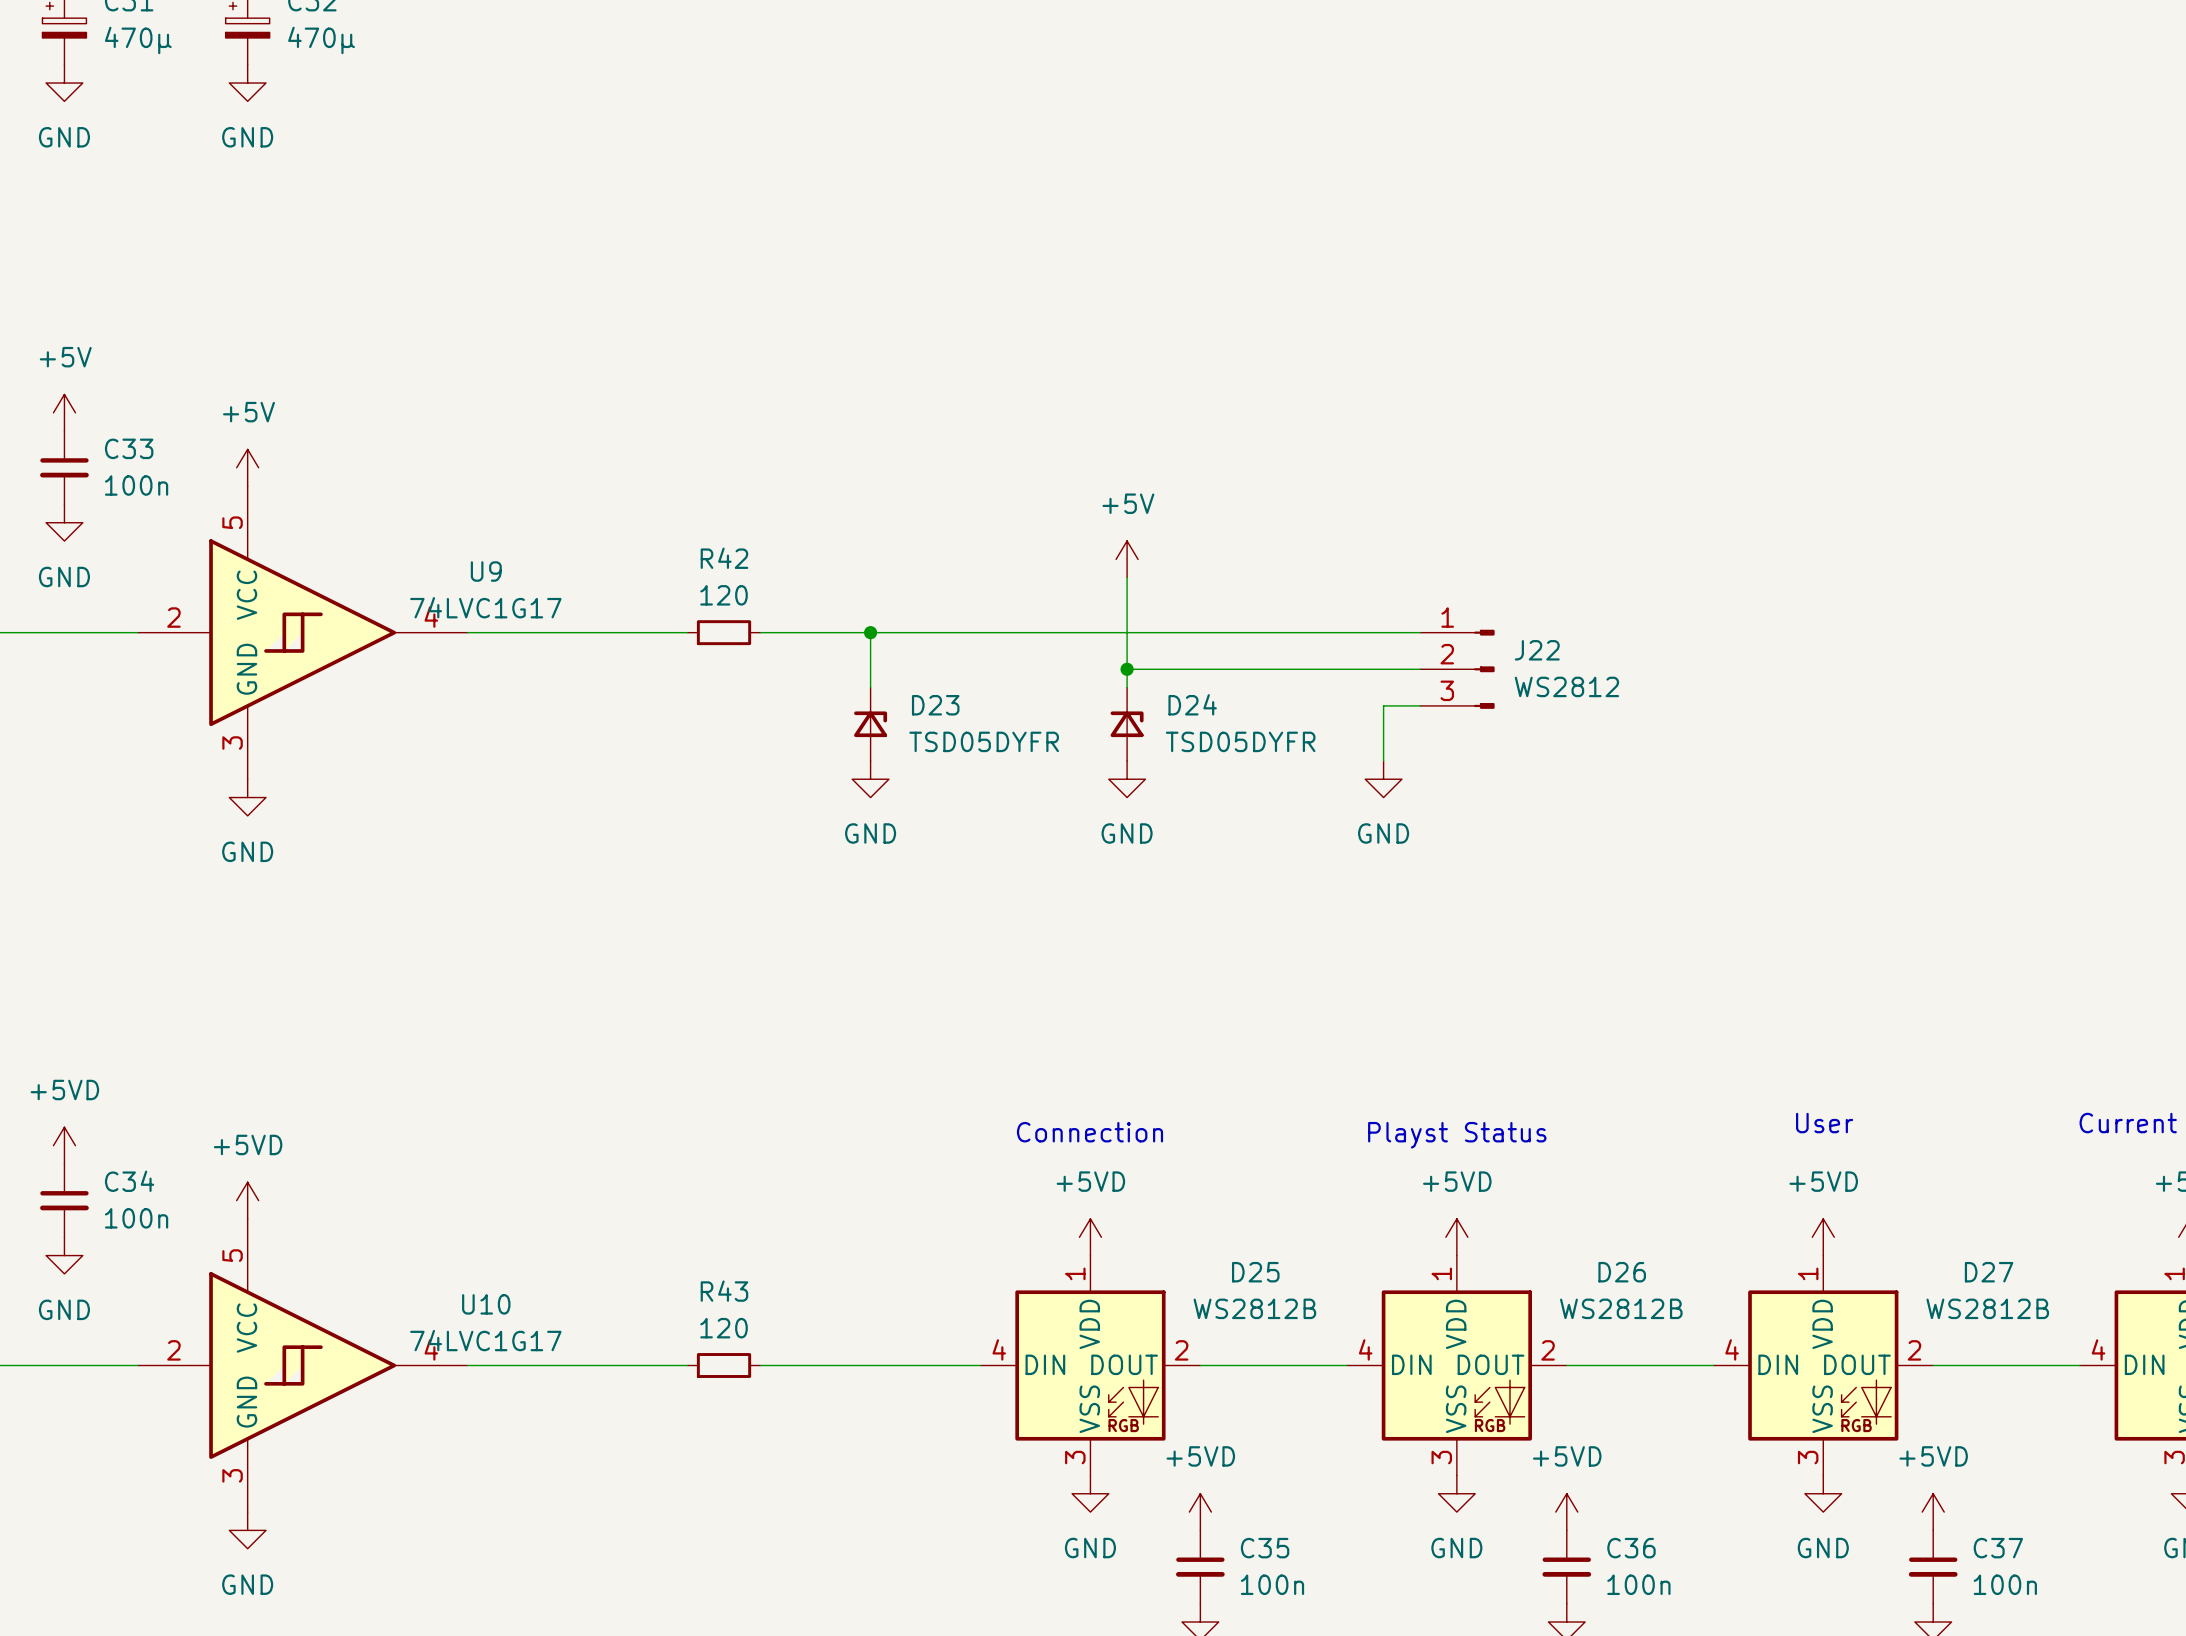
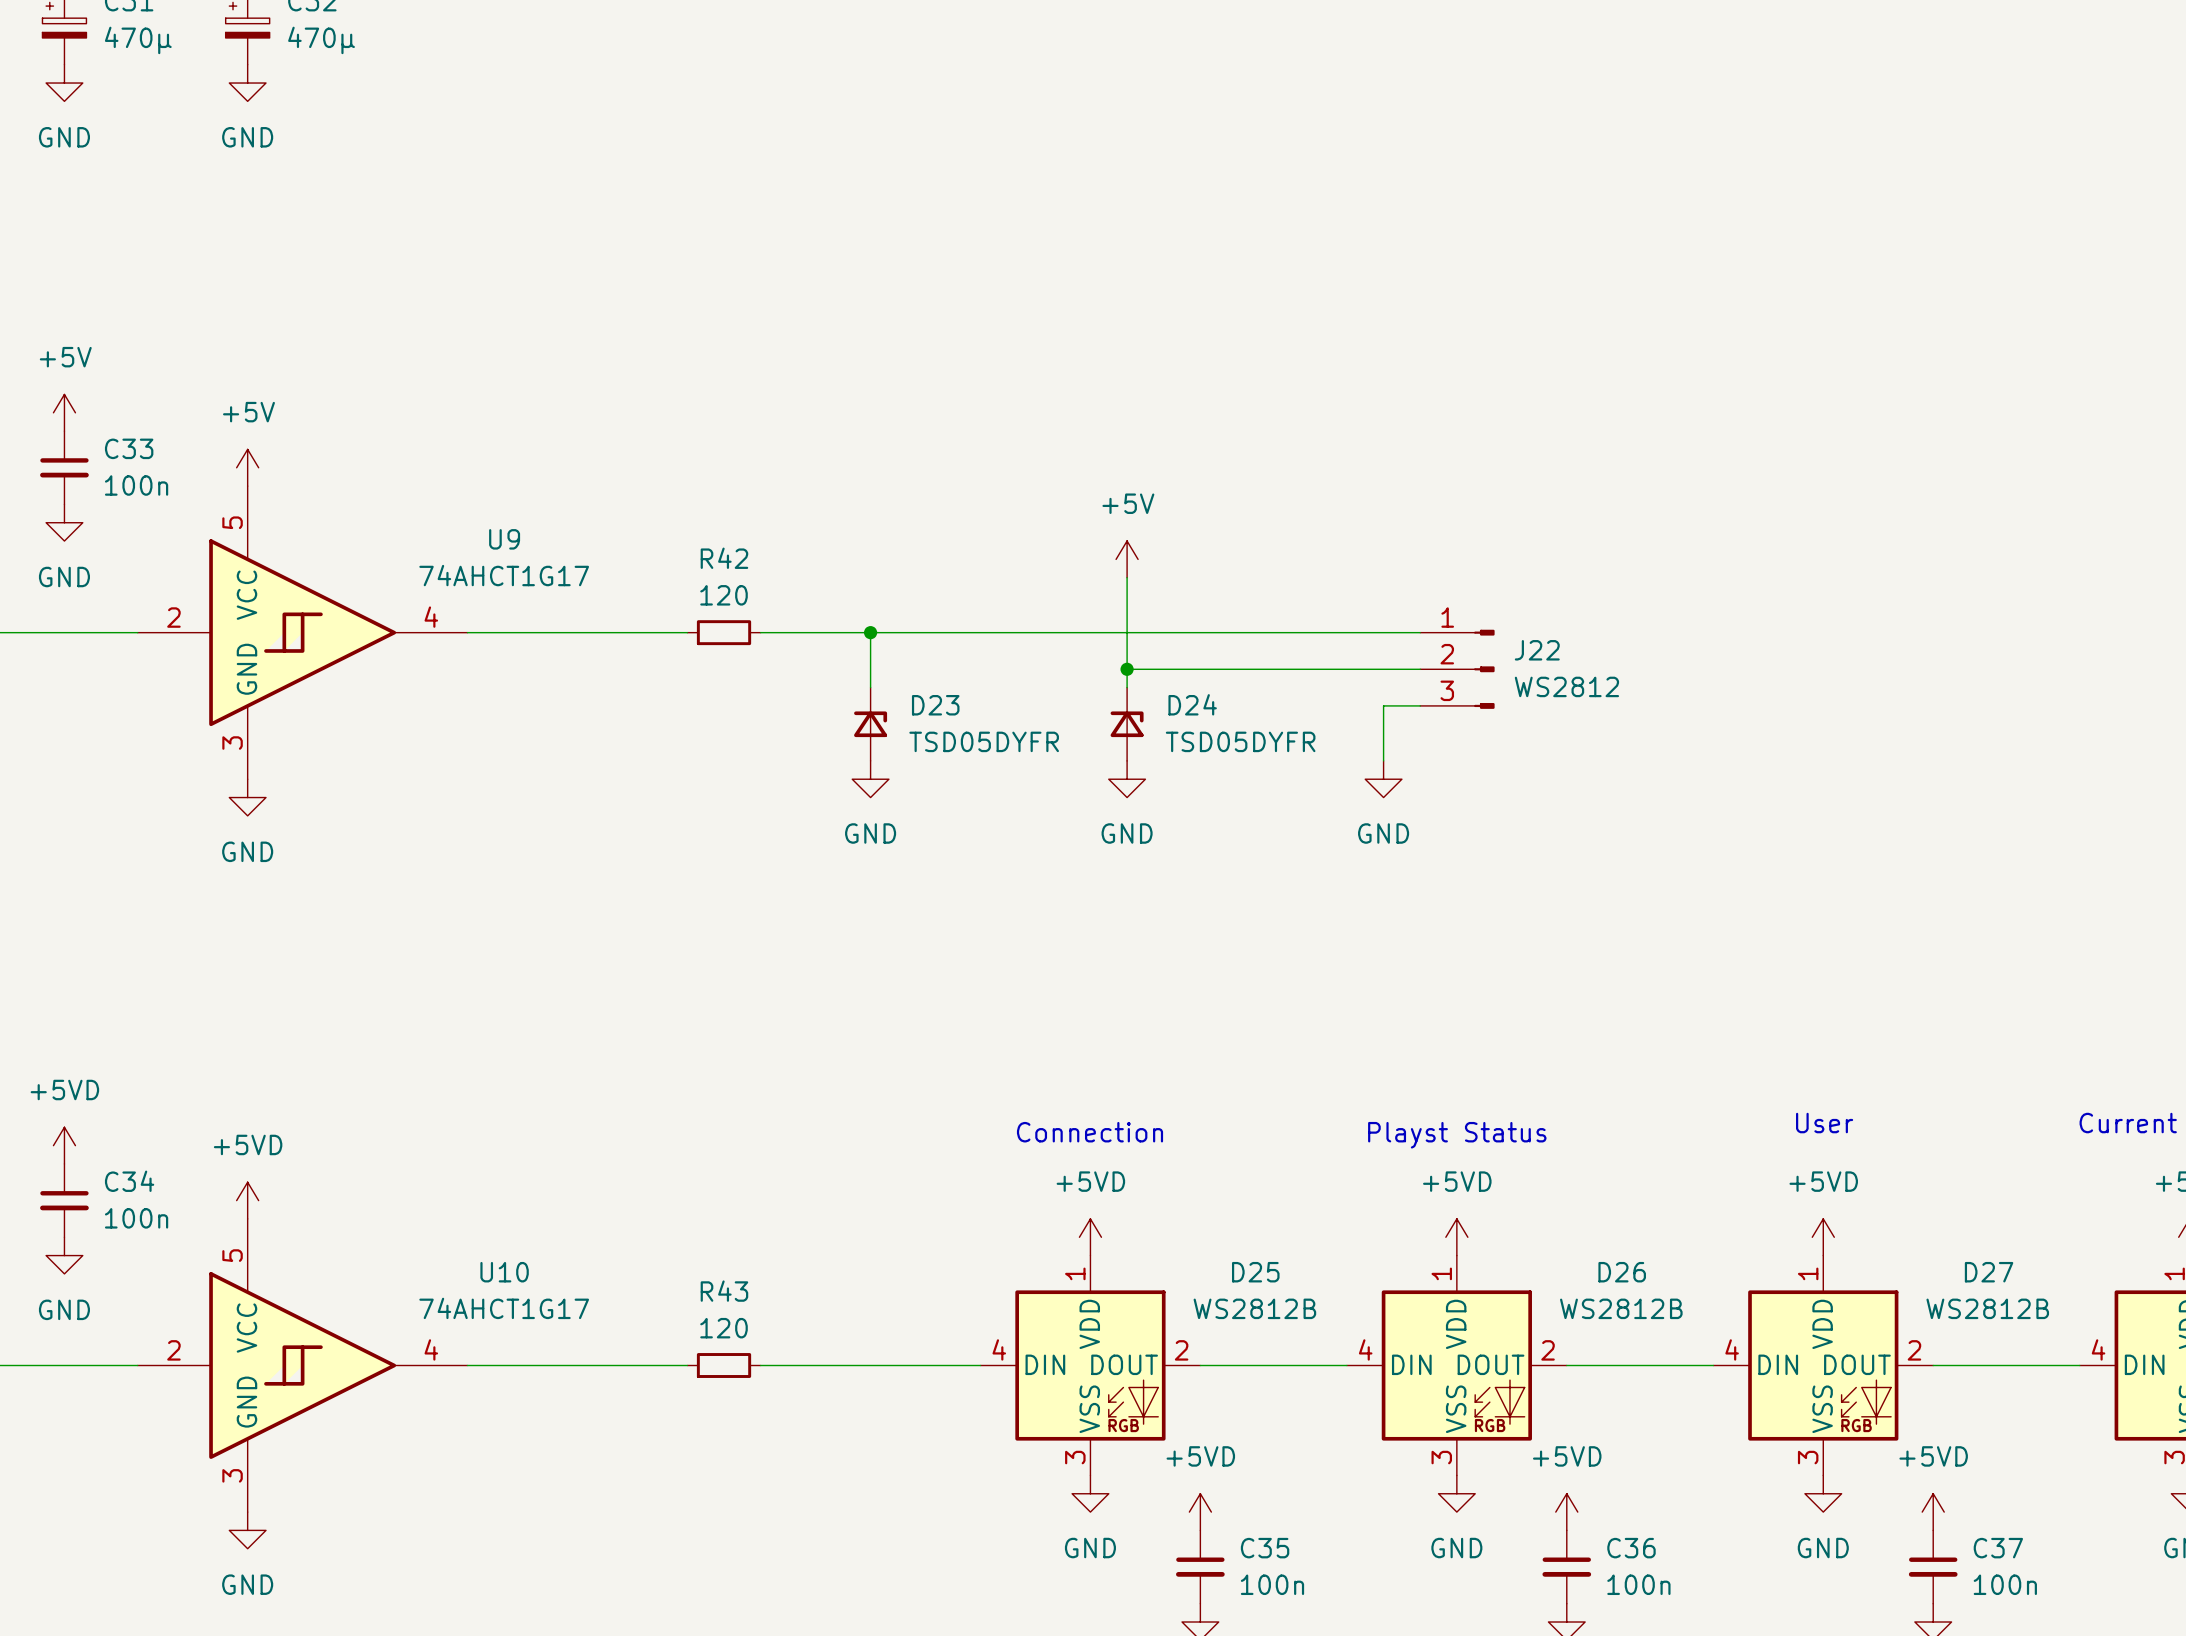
U9 name position: U9 (486, 571) -> U9 (504, 539)
U9 value: 74LVC1G17 (485, 607) -> 74AHCT1G17 (504, 575)
U10 name position: U10 (486, 1304) -> U10 (504, 1272)
U10 value: 74LVC1G17 (485, 1340) -> 74AHCT1G17 (504, 1308)

